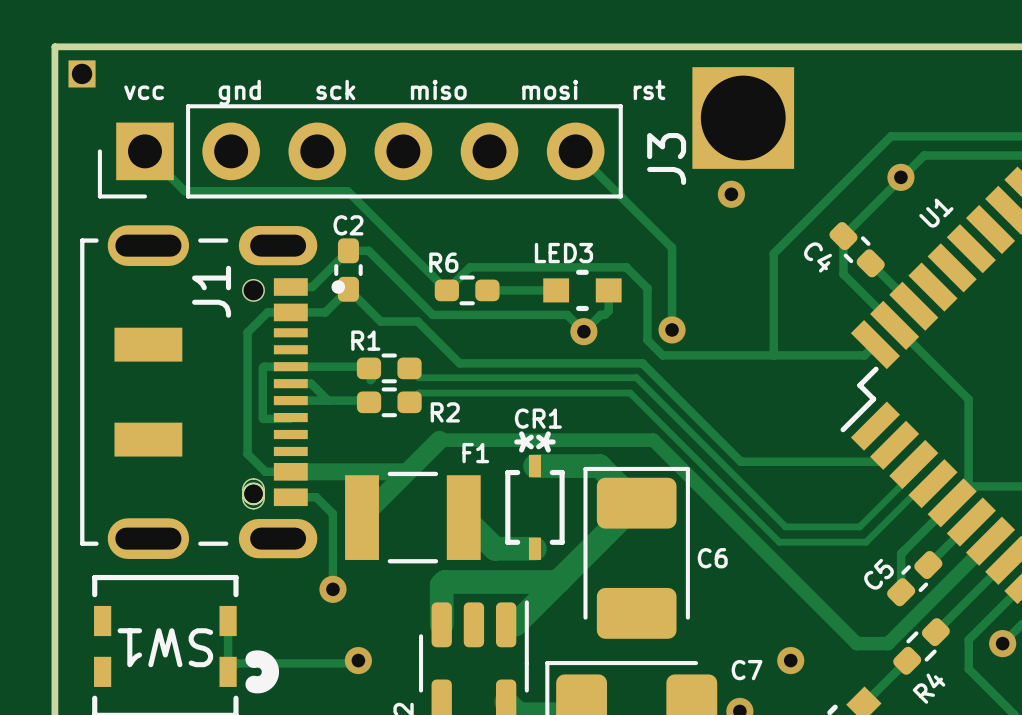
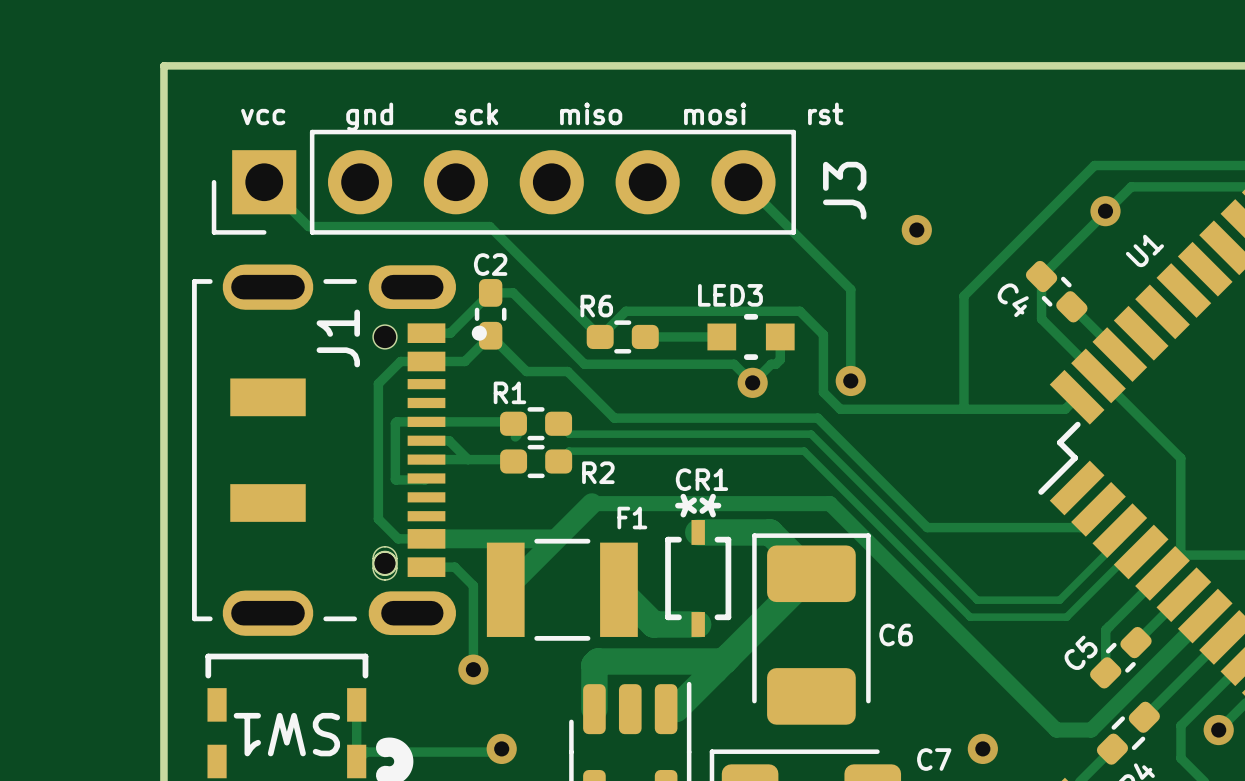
part: (82, 73) -> none
part: (743, 118) -> none

